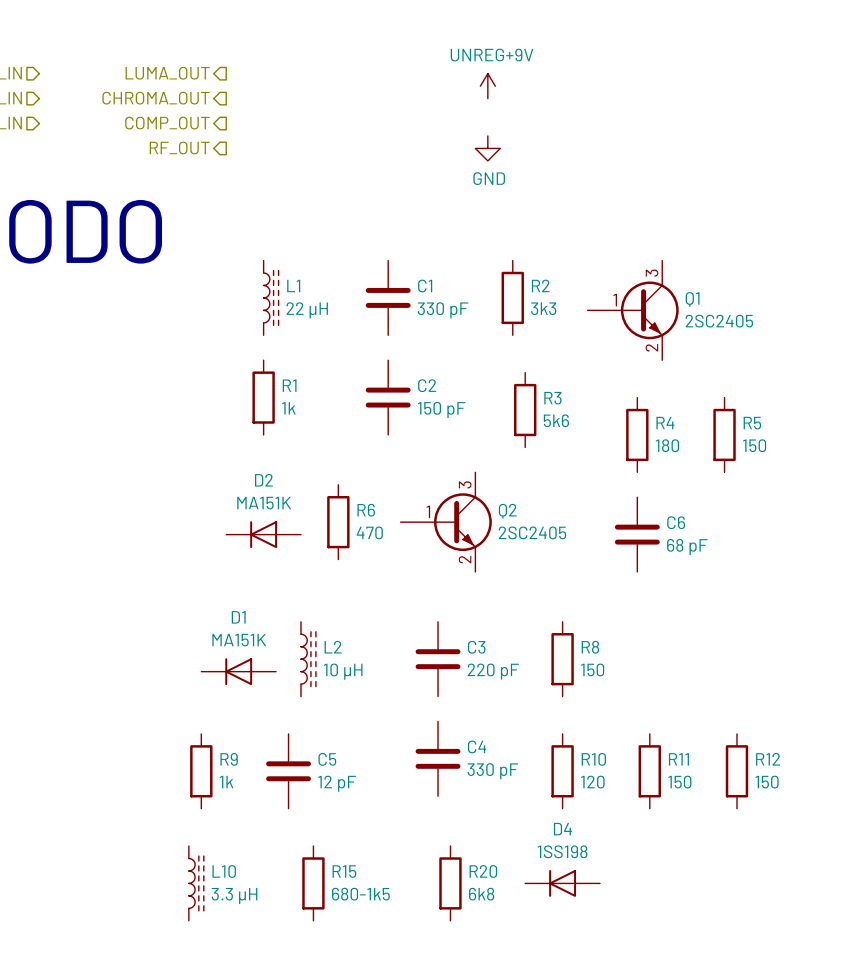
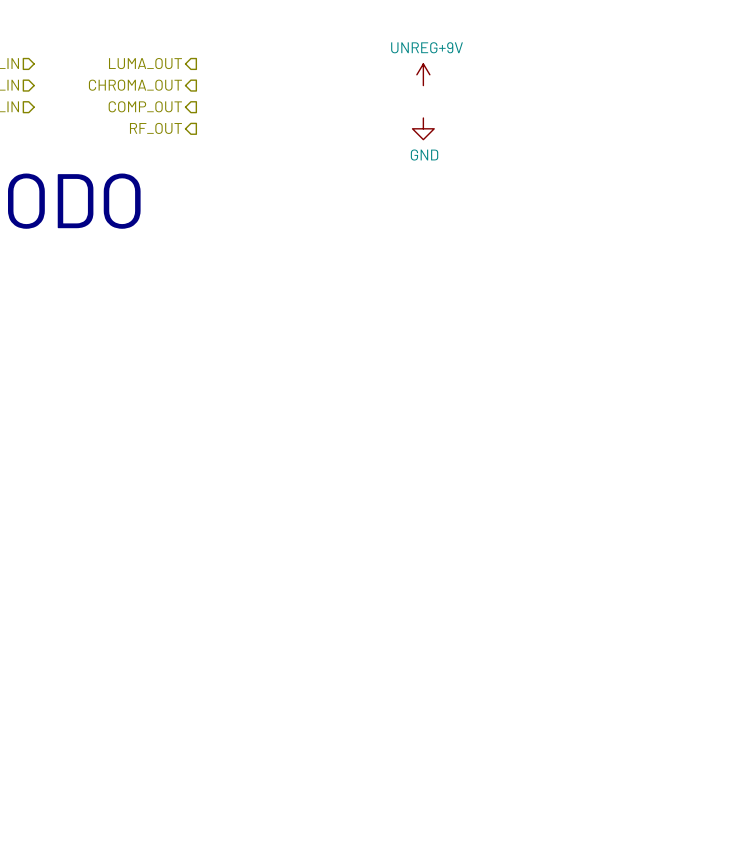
L1: 22 μH (271, 297) -> none
C1: 330 pF (388, 297) -> none
R2: 3k3 (512, 297) -> none
Q1: 2SC2405 (633, 310) -> none
R1: 1k (263, 397) -> none
C2: 150 pF (388, 397) -> none
R3: 5k6 (525, 410) -> none
R4: 180 (637, 434) -> none
R5: 150 (724, 434) -> none
R6: 470 (338, 522) -> none
Q2: 2SC2405 (446, 522) -> none
D2: MA151K (263, 534) -> none
C6: 68 pF (637, 534) -> none
L2: 10 μH (308, 659) -> none
C3: 220 pF (438, 659) -> none
R8: 150 (562, 659) -> none
D1: MA151K (238, 671) -> none
C4: 330 pF (438, 758) -> none
R9: 1k (201, 771) -> none
C5: 12 pF (288, 771) -> none
R10: 120 (562, 771) -> none
R11: 150 (649, 771) -> none
R12: 150 (736, 771) -> none
L10: 3.3 μH (196, 883) -> none
R15: 680-1k5 (313, 883) -> none
R20: 6k8 (450, 883) -> none
D4: 1SS198 (562, 883) -> none

